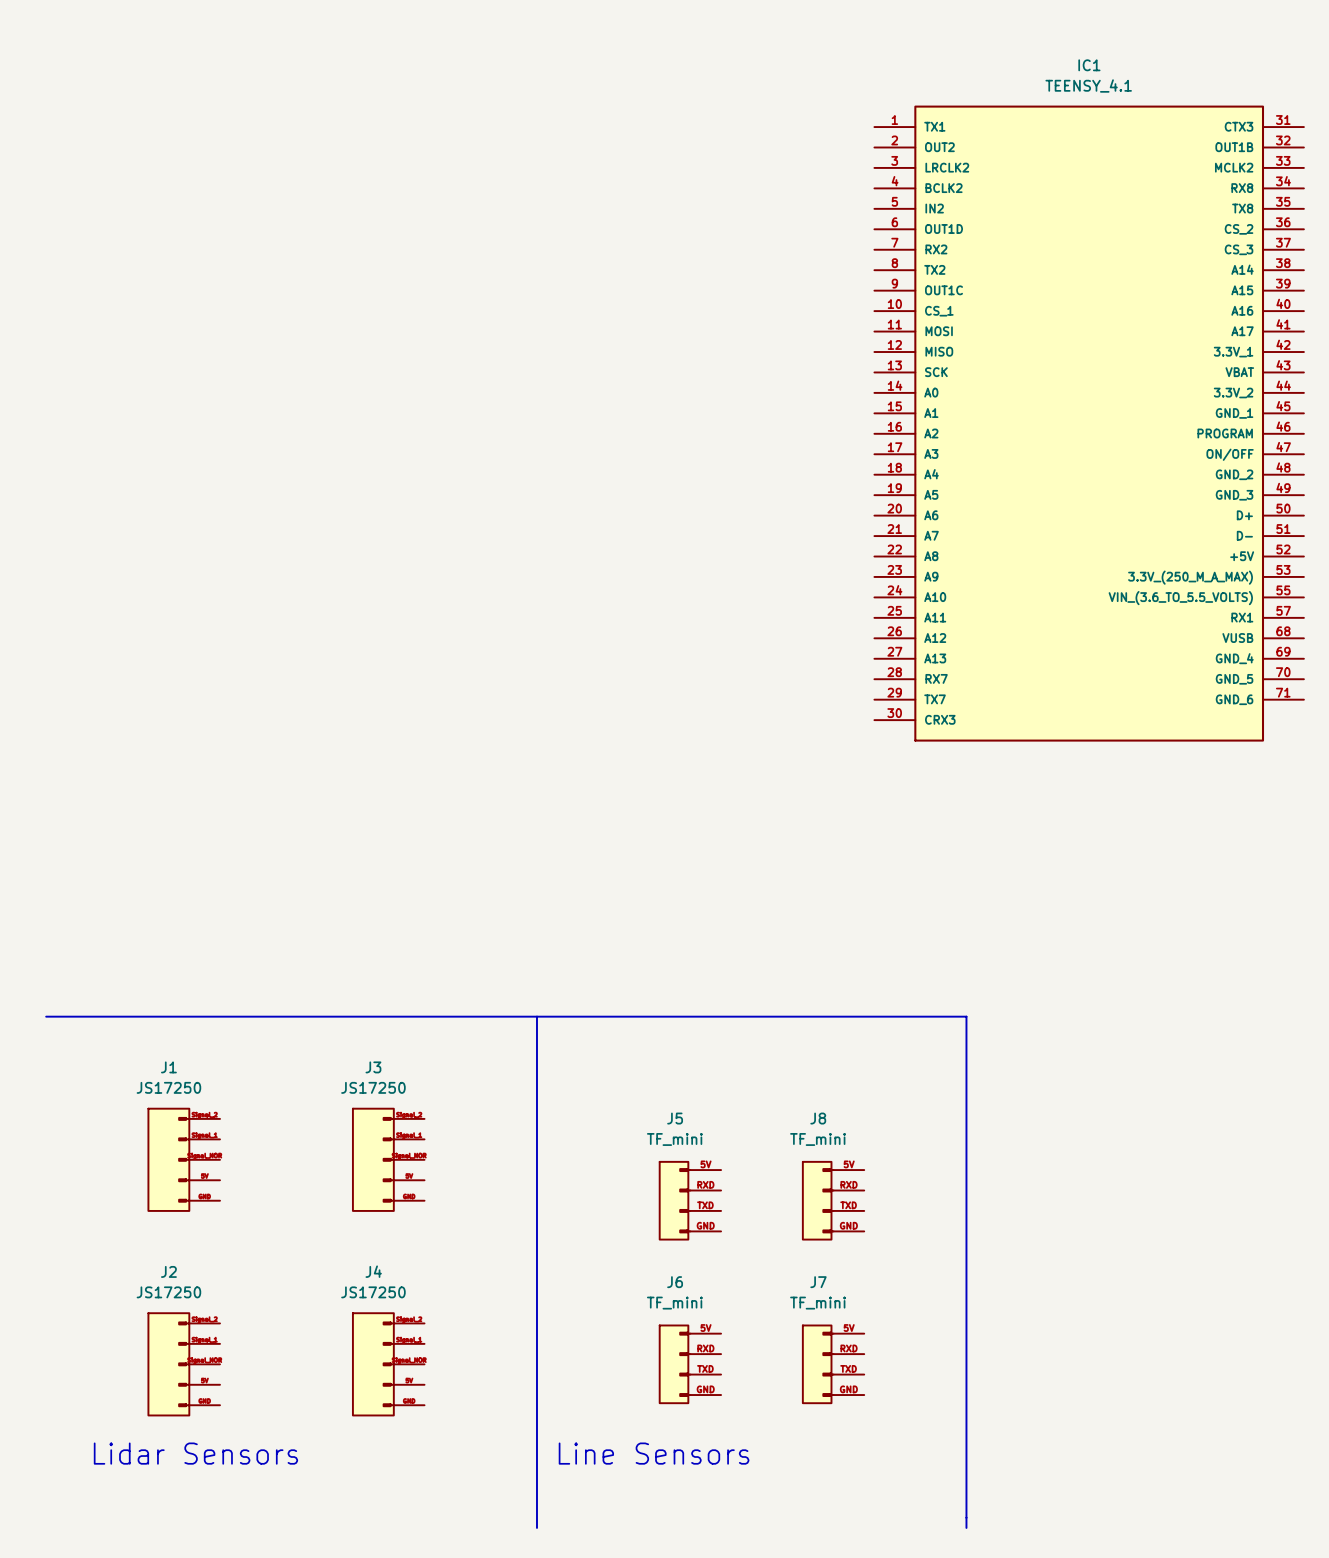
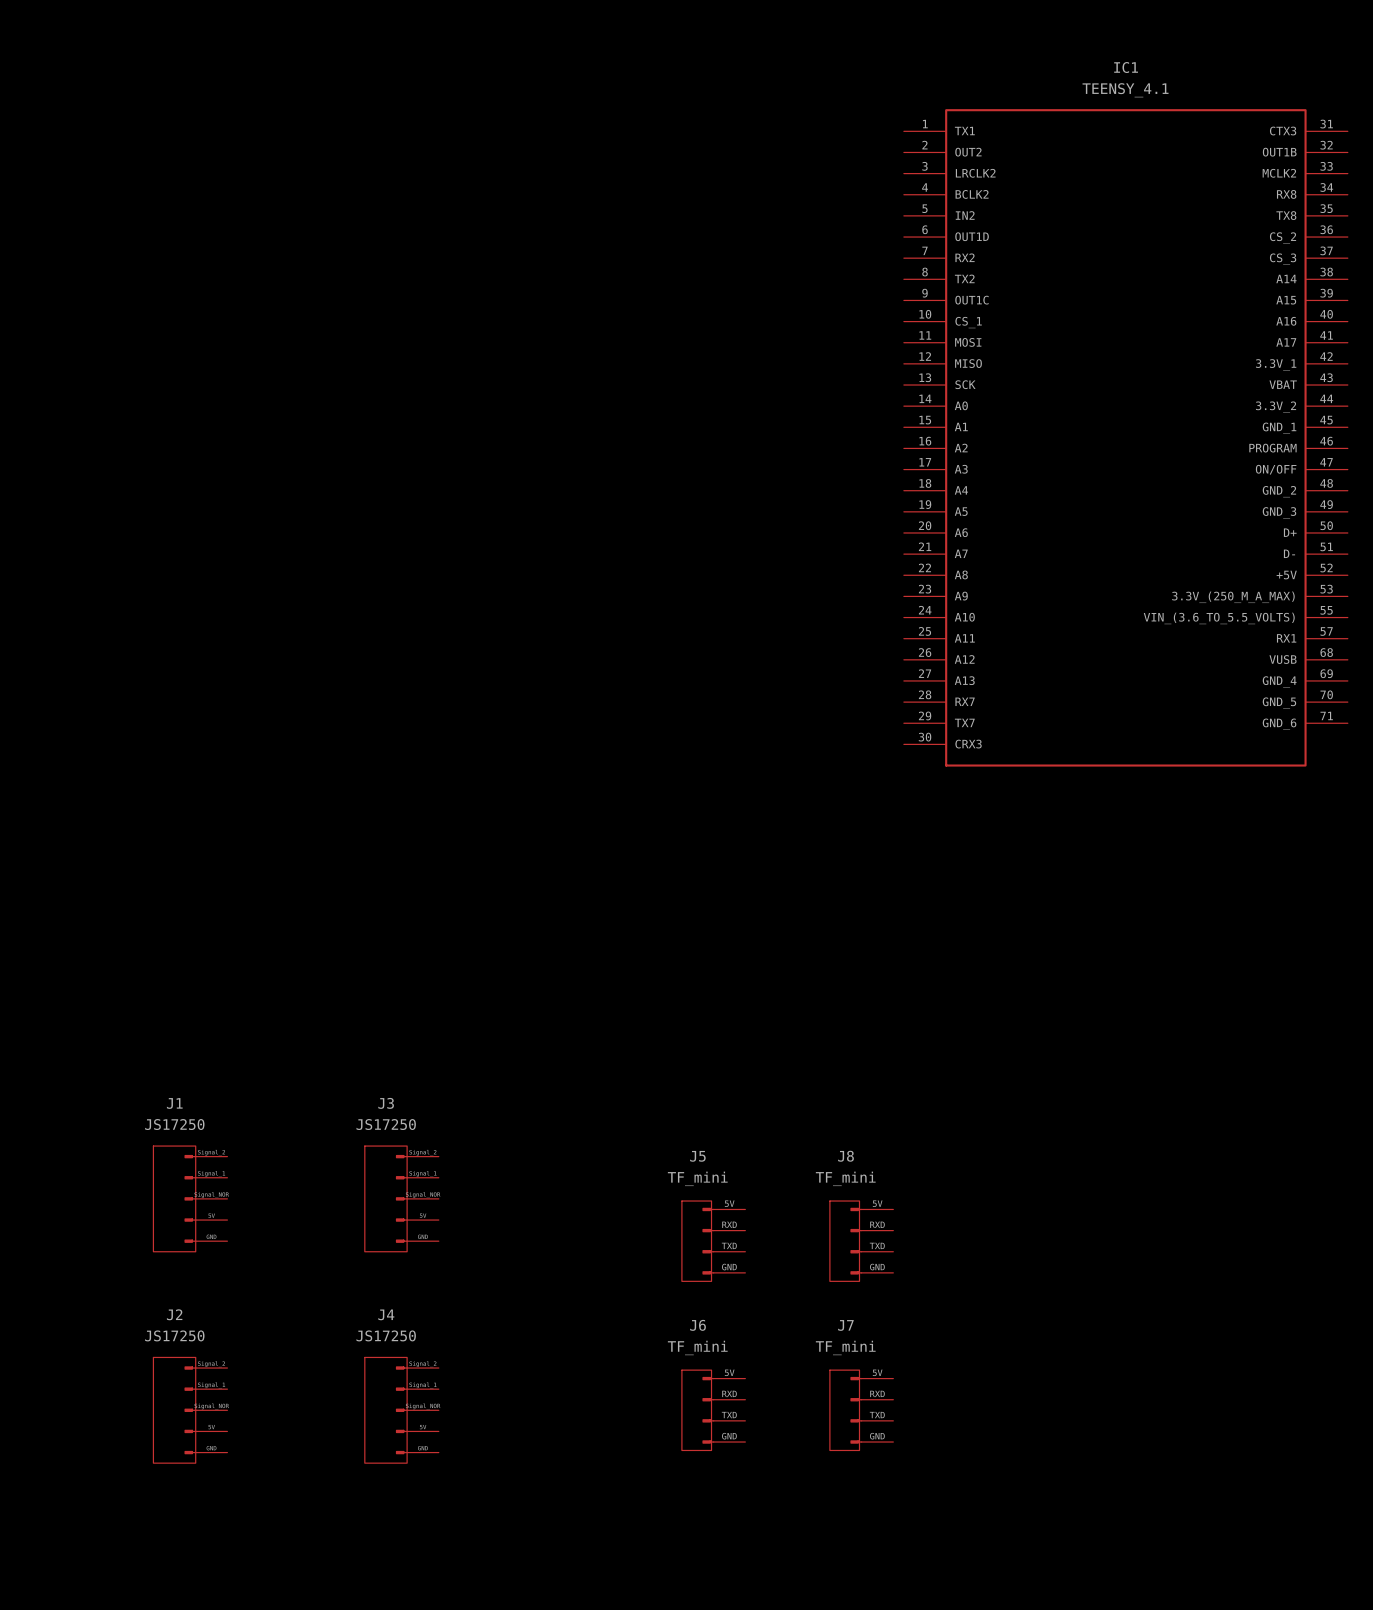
line: (46, 1016) (966, 1016) (966, 1527) -> none
line: (536, 1016) (536, 1527) -> none
text: Lidar Sensors (195, 1453) -> none
text: Line Sensors (654, 1453) -> none

